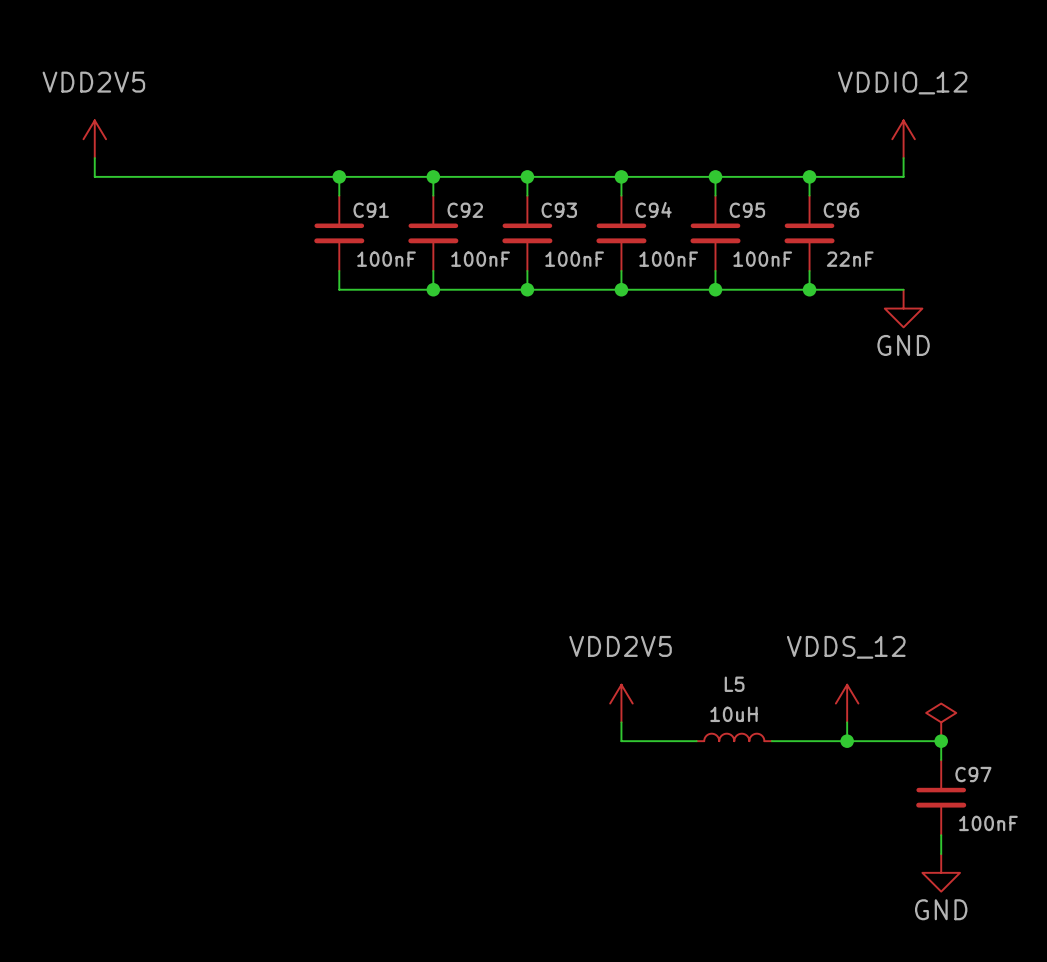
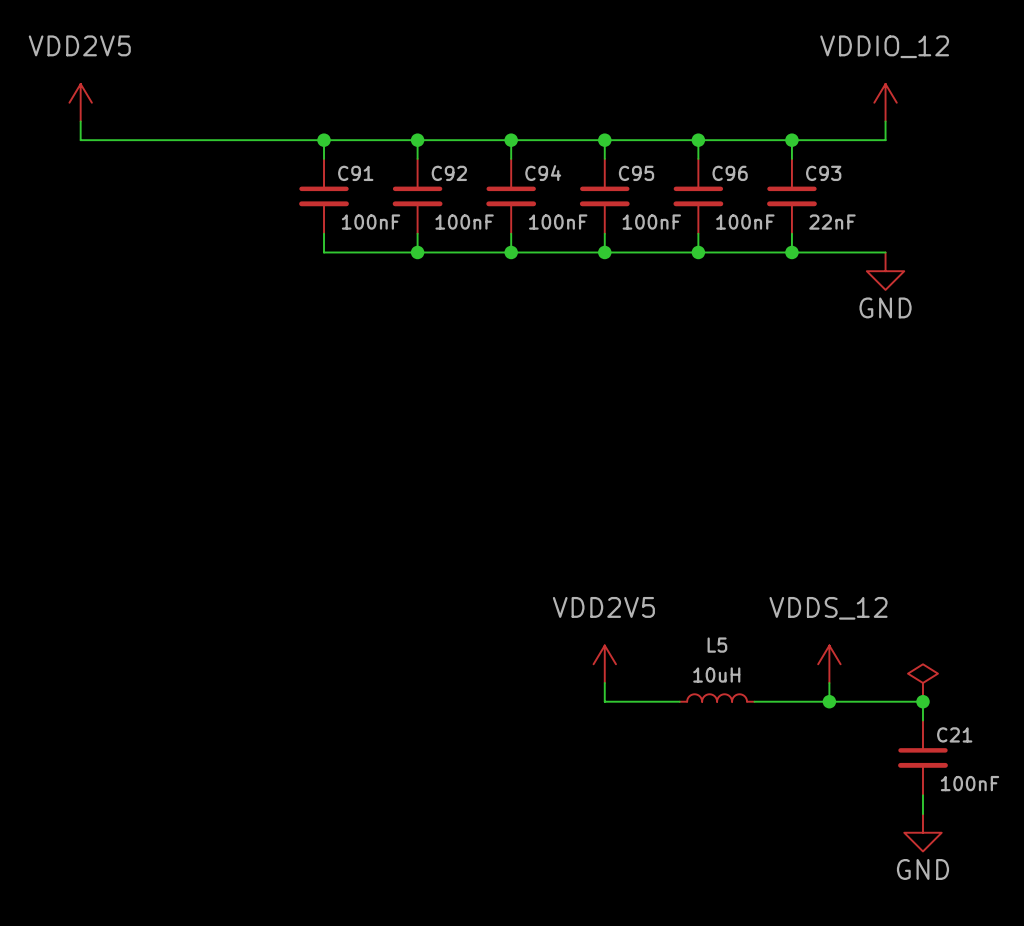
C94 name: C94 (653, 209) -> C95 (636, 173)
C93 name: C93 (559, 210) -> C94 (543, 173)
C95 name: C95 (747, 210) -> C96 (730, 173)
C96 name: C96 (841, 210) -> C93 (823, 173)
C97 name: C97 (973, 774) -> C21 (954, 734)

